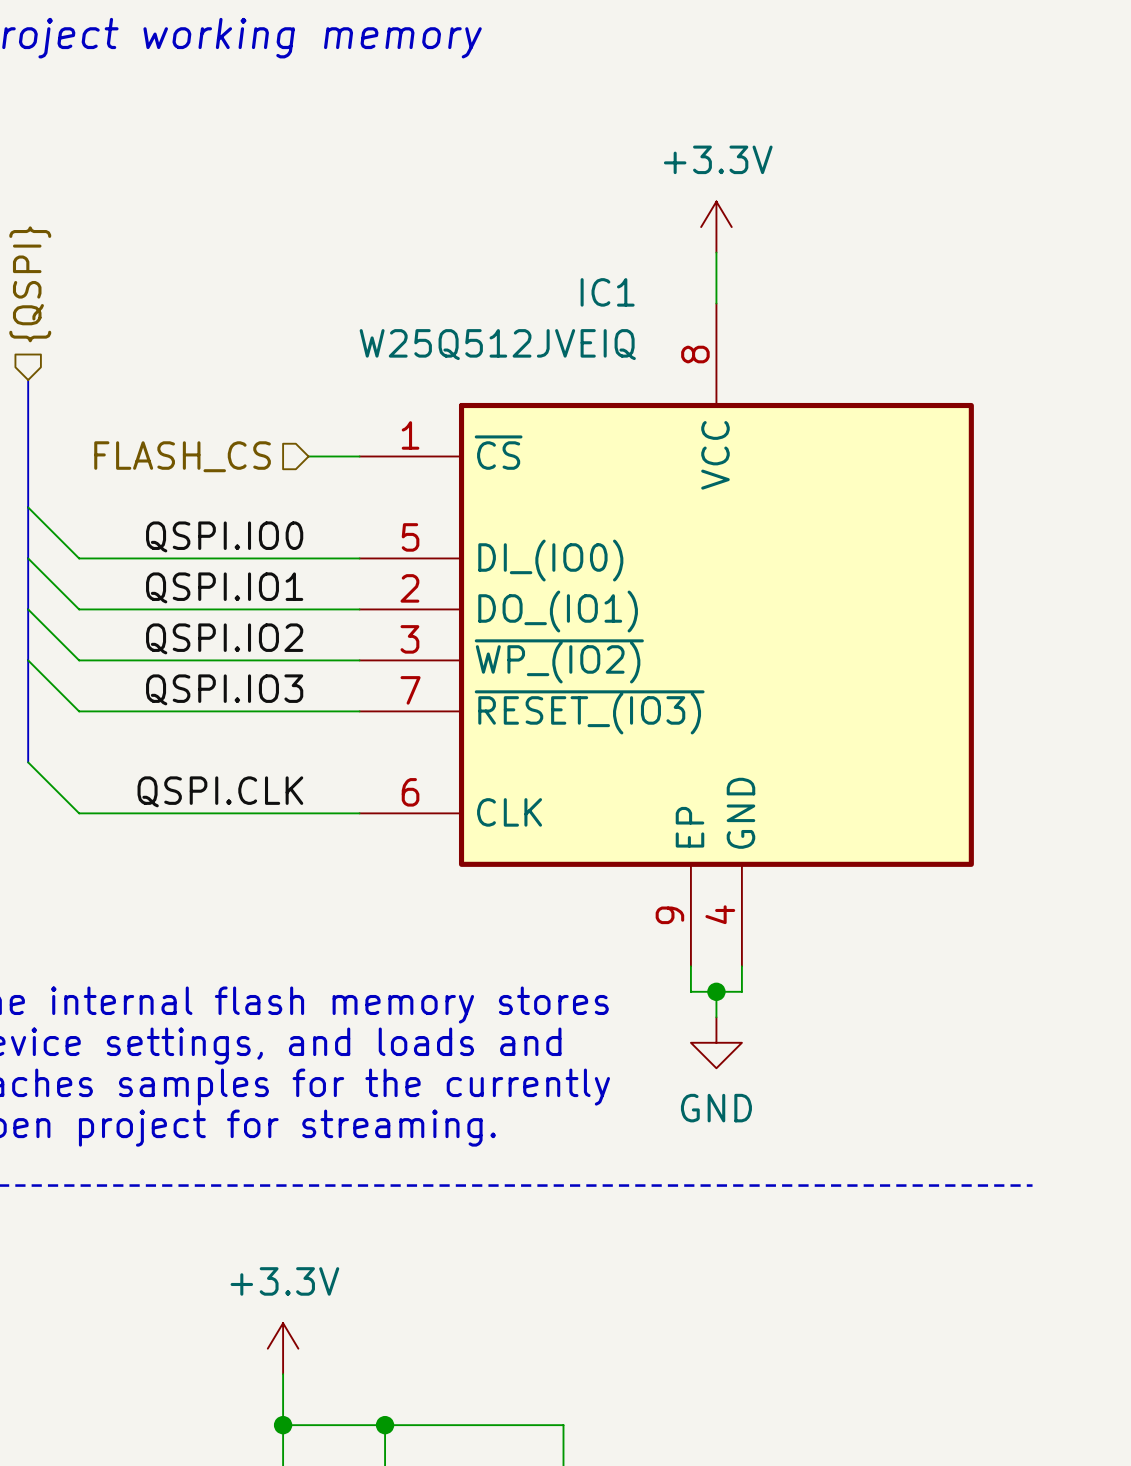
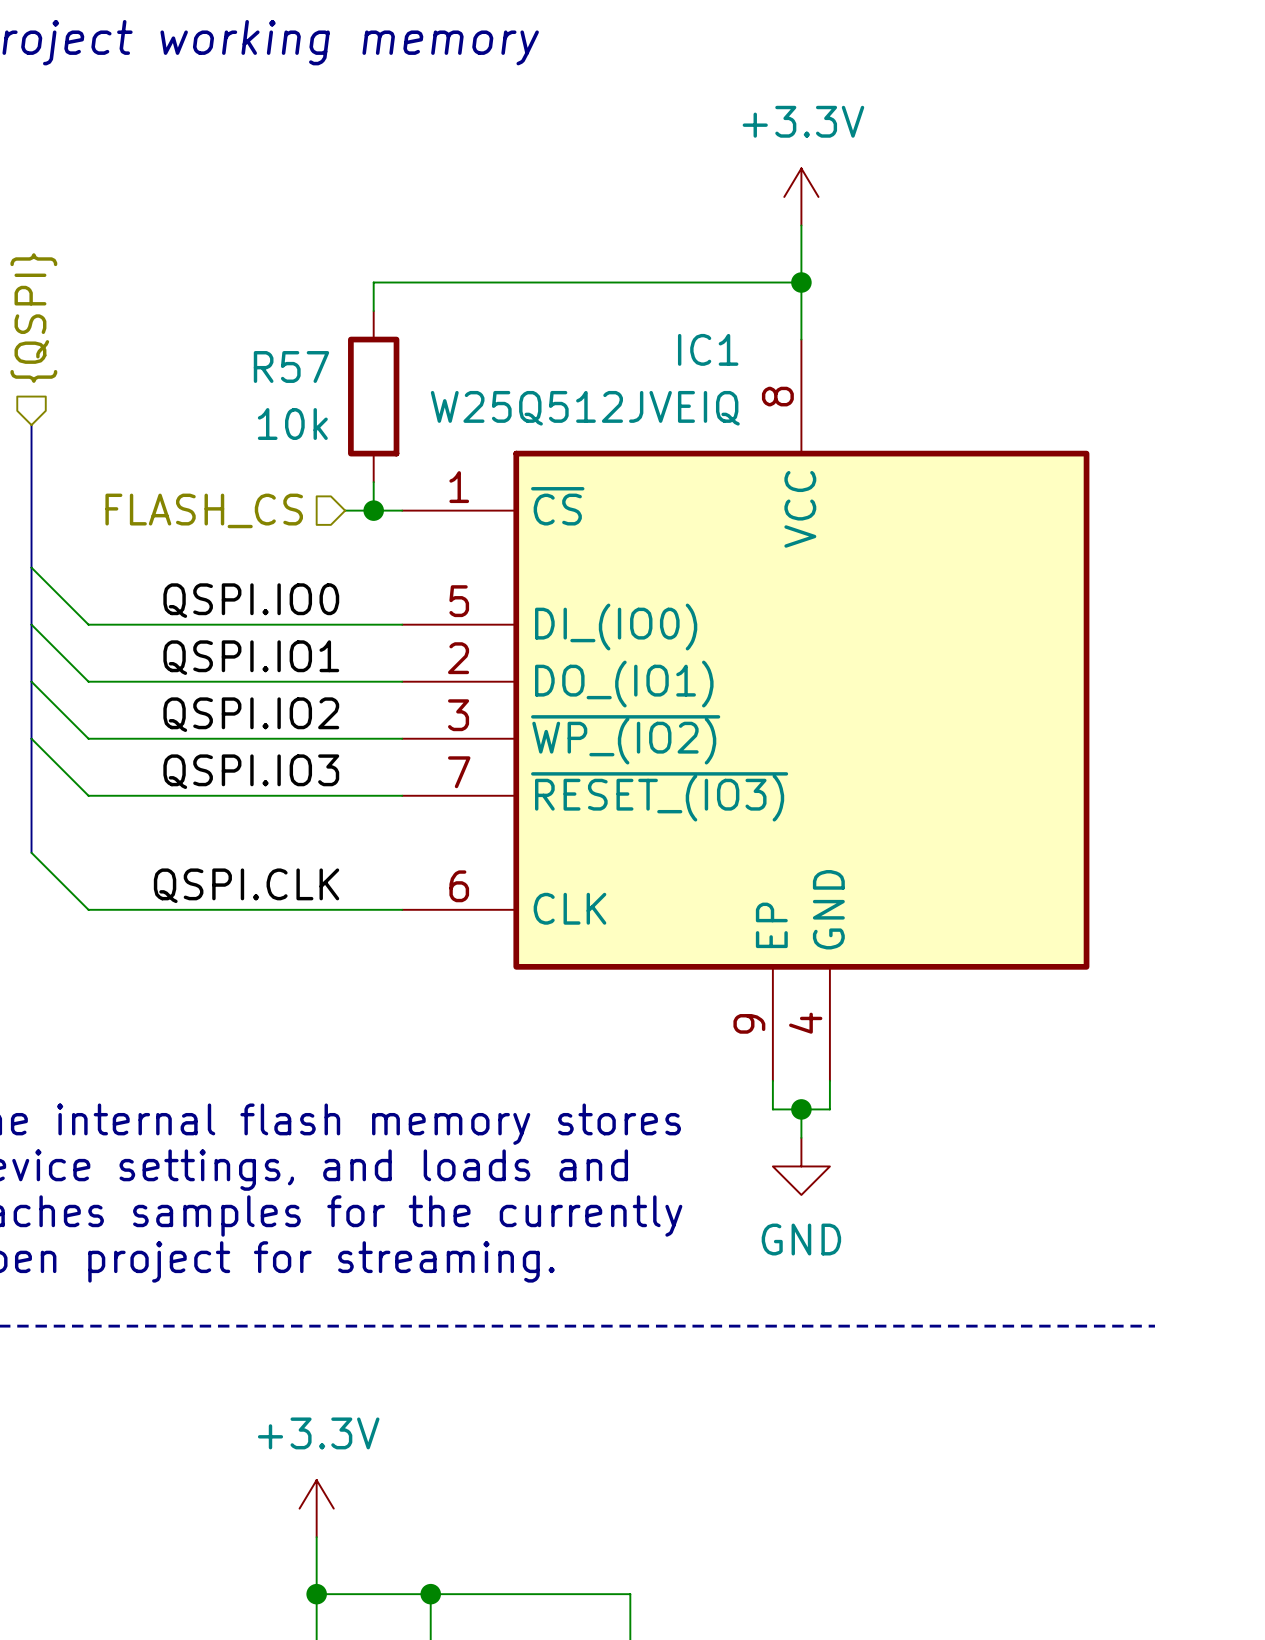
wire: none -> (801, 225) (801, 282) (373, 282) (373, 311)
power symbol position: +3.3V (716, 227) -> +3.3V (801, 196)
junction: none -> (801, 282)
IC1 name position: IC1 (607, 292) -> IC1 (708, 349)
IC1 value position: W25Q512JVEIQ (497, 344) -> W25Q512JVEIQ (585, 408)
R57: none -> 10k (373, 396)
wire: none -> (373, 482) (373, 510)
junction: none -> (373, 510)

